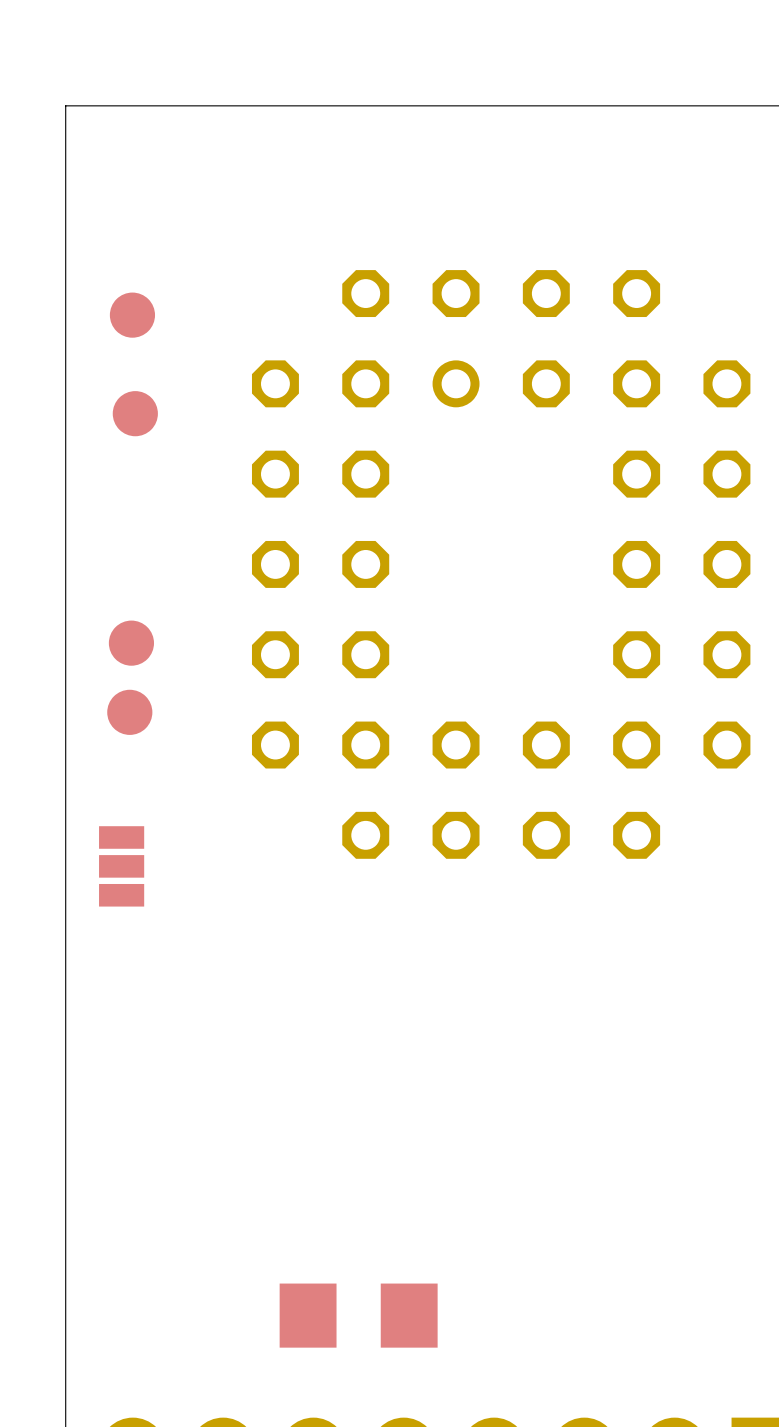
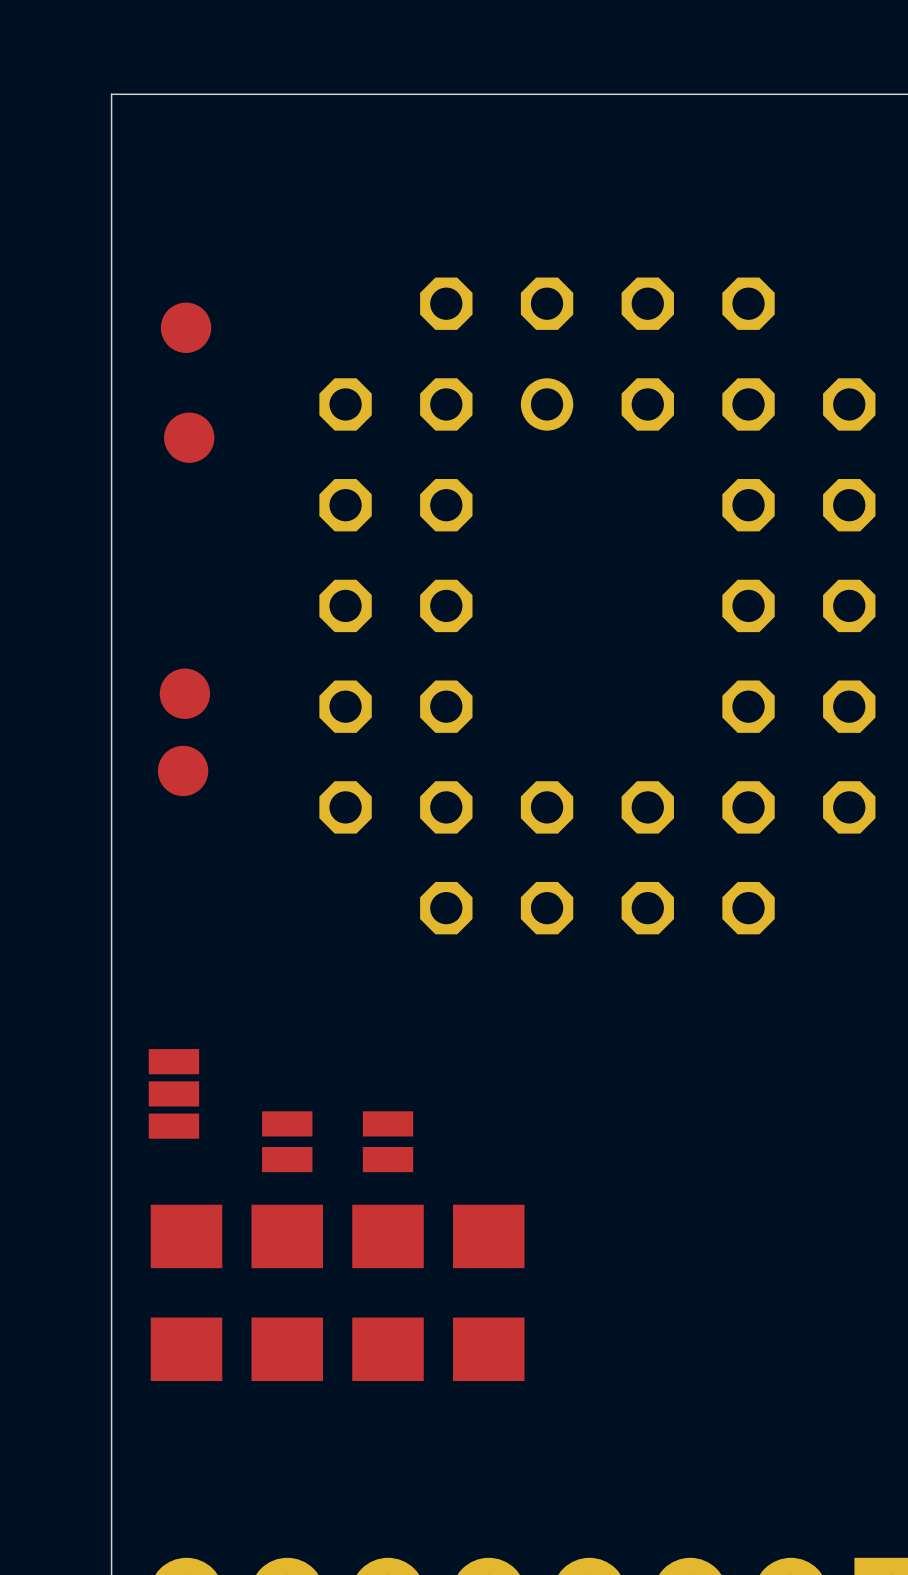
part position: (121, 866) -> (173, 1093)
part: none -> (287, 1141)
part: none -> (388, 1141)
part: none -> (186, 1292)
part: none -> (287, 1292)
part: none -> (388, 1292)
part: none -> (488, 1292)
part: (358, 1315) -> none

